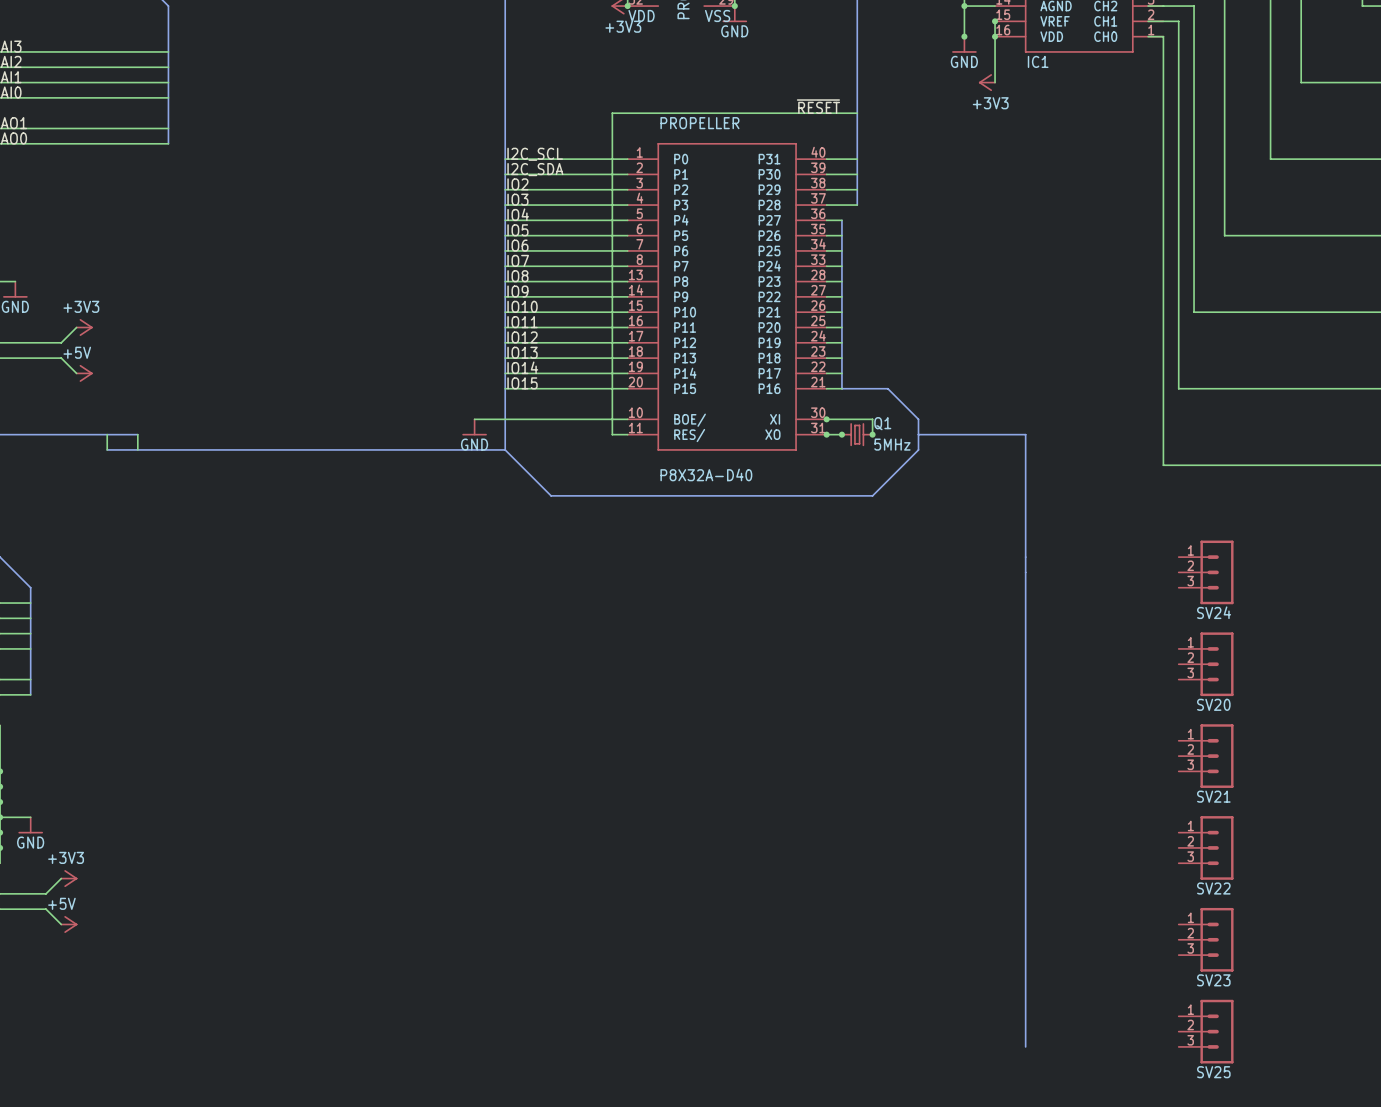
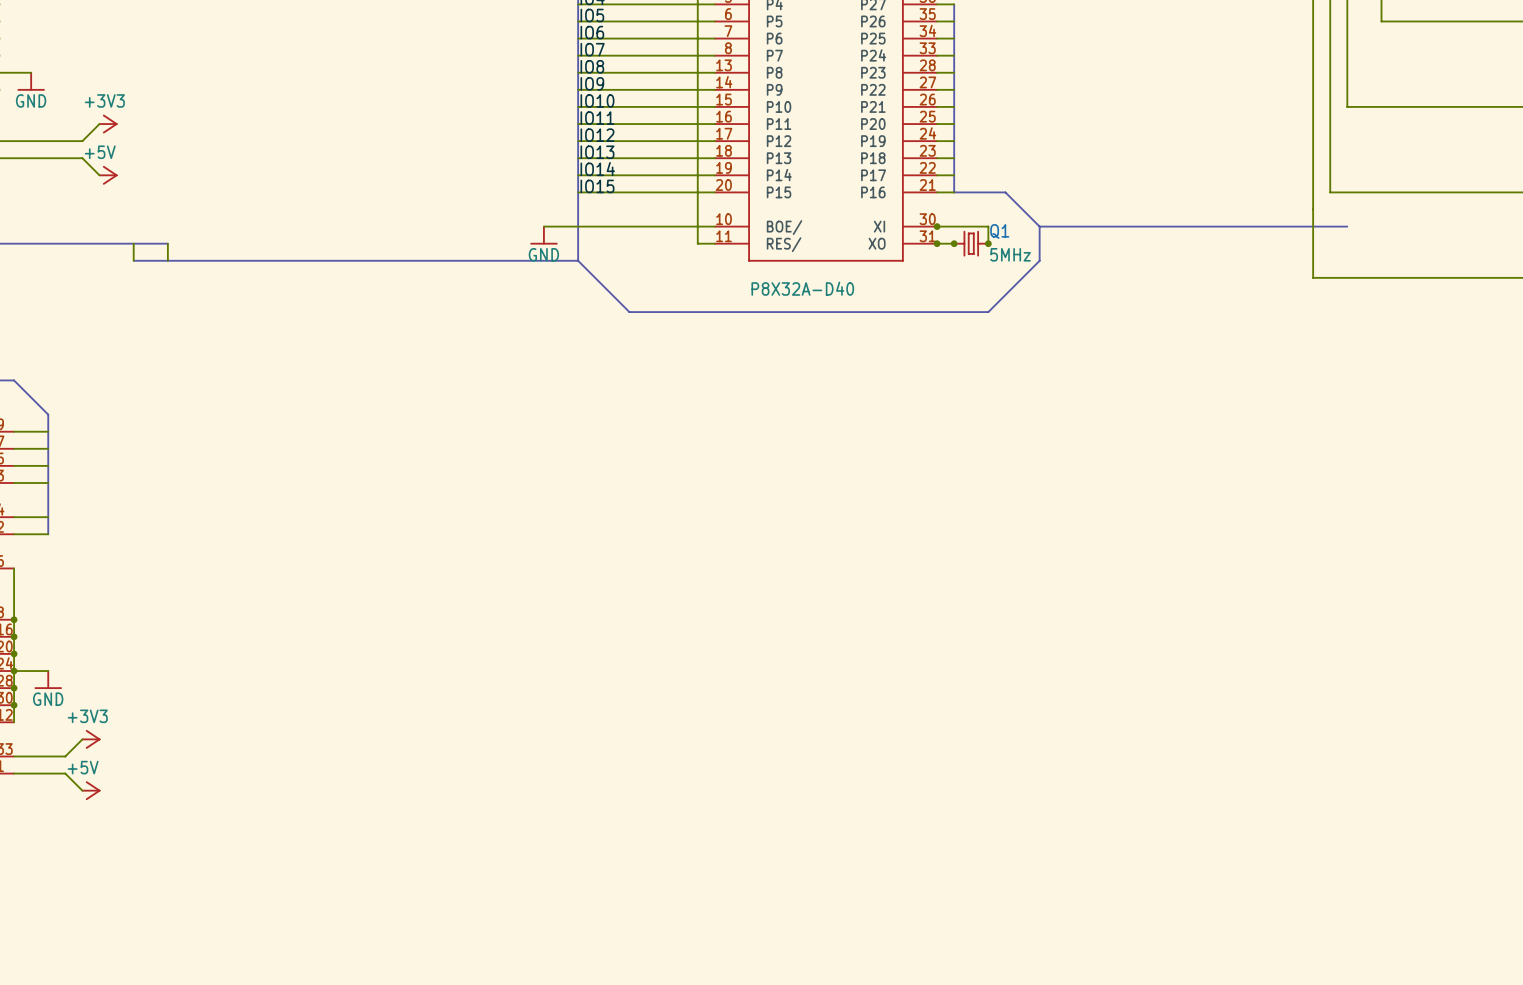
bus: none -> (1039, 226) (1347, 226)
bus: (918, 434) (1025, 434) (1025, 1046) -> none
SV24: (1206, 572) -> none
SV20: (1206, 664) -> none
SV21: (1206, 756) -> none
SV22: (1206, 847) -> none
SV23: (1206, 939) -> none
SV25: (1206, 1031) -> none

